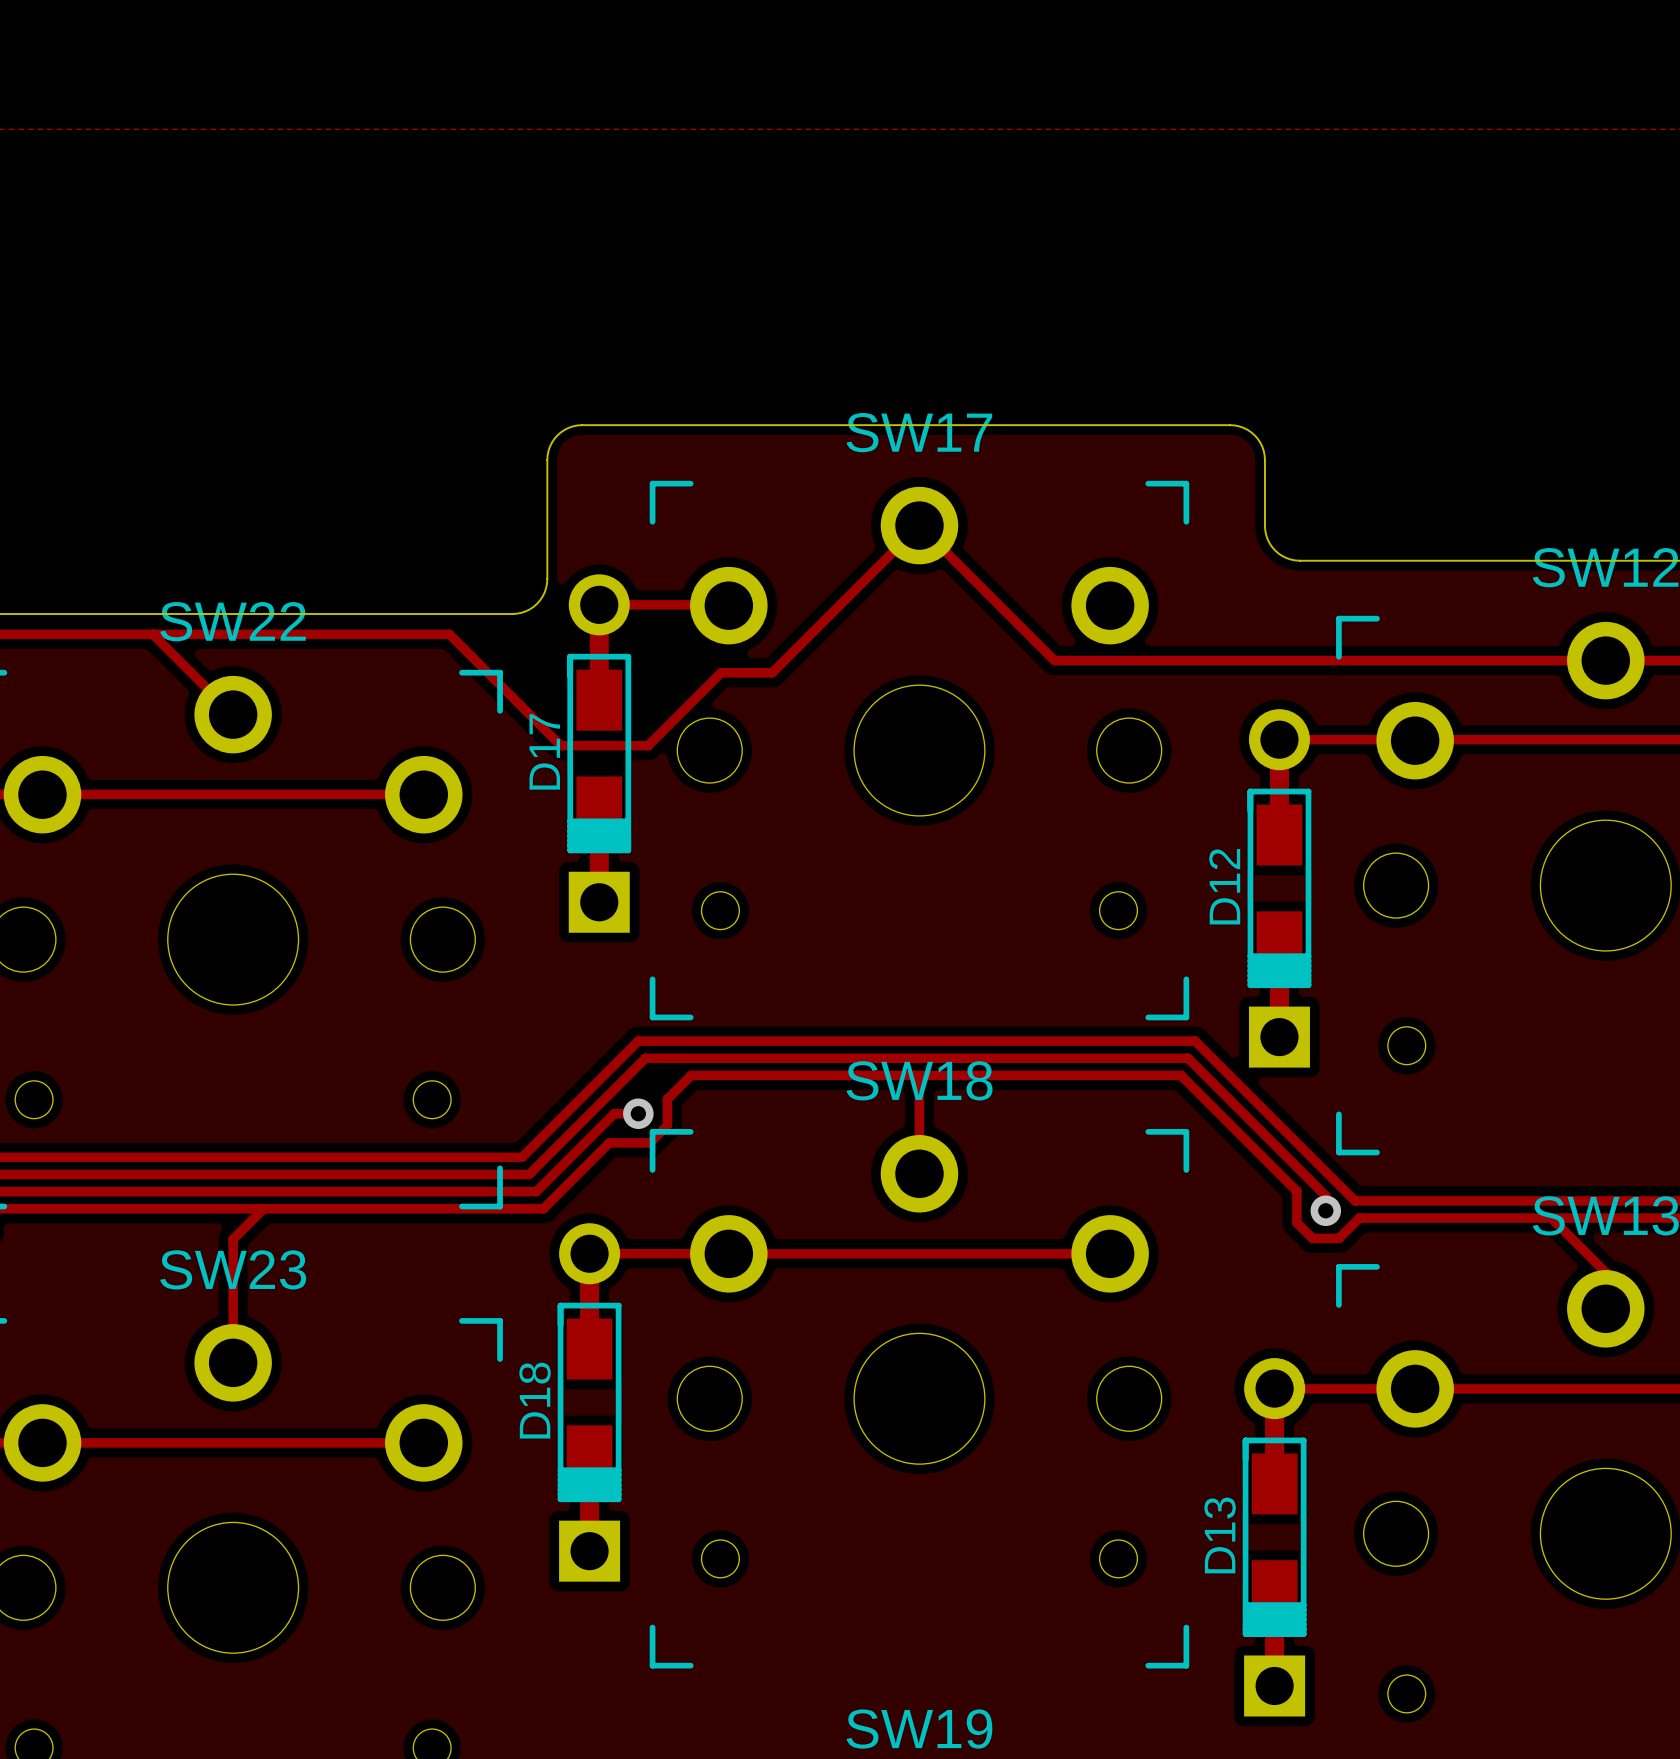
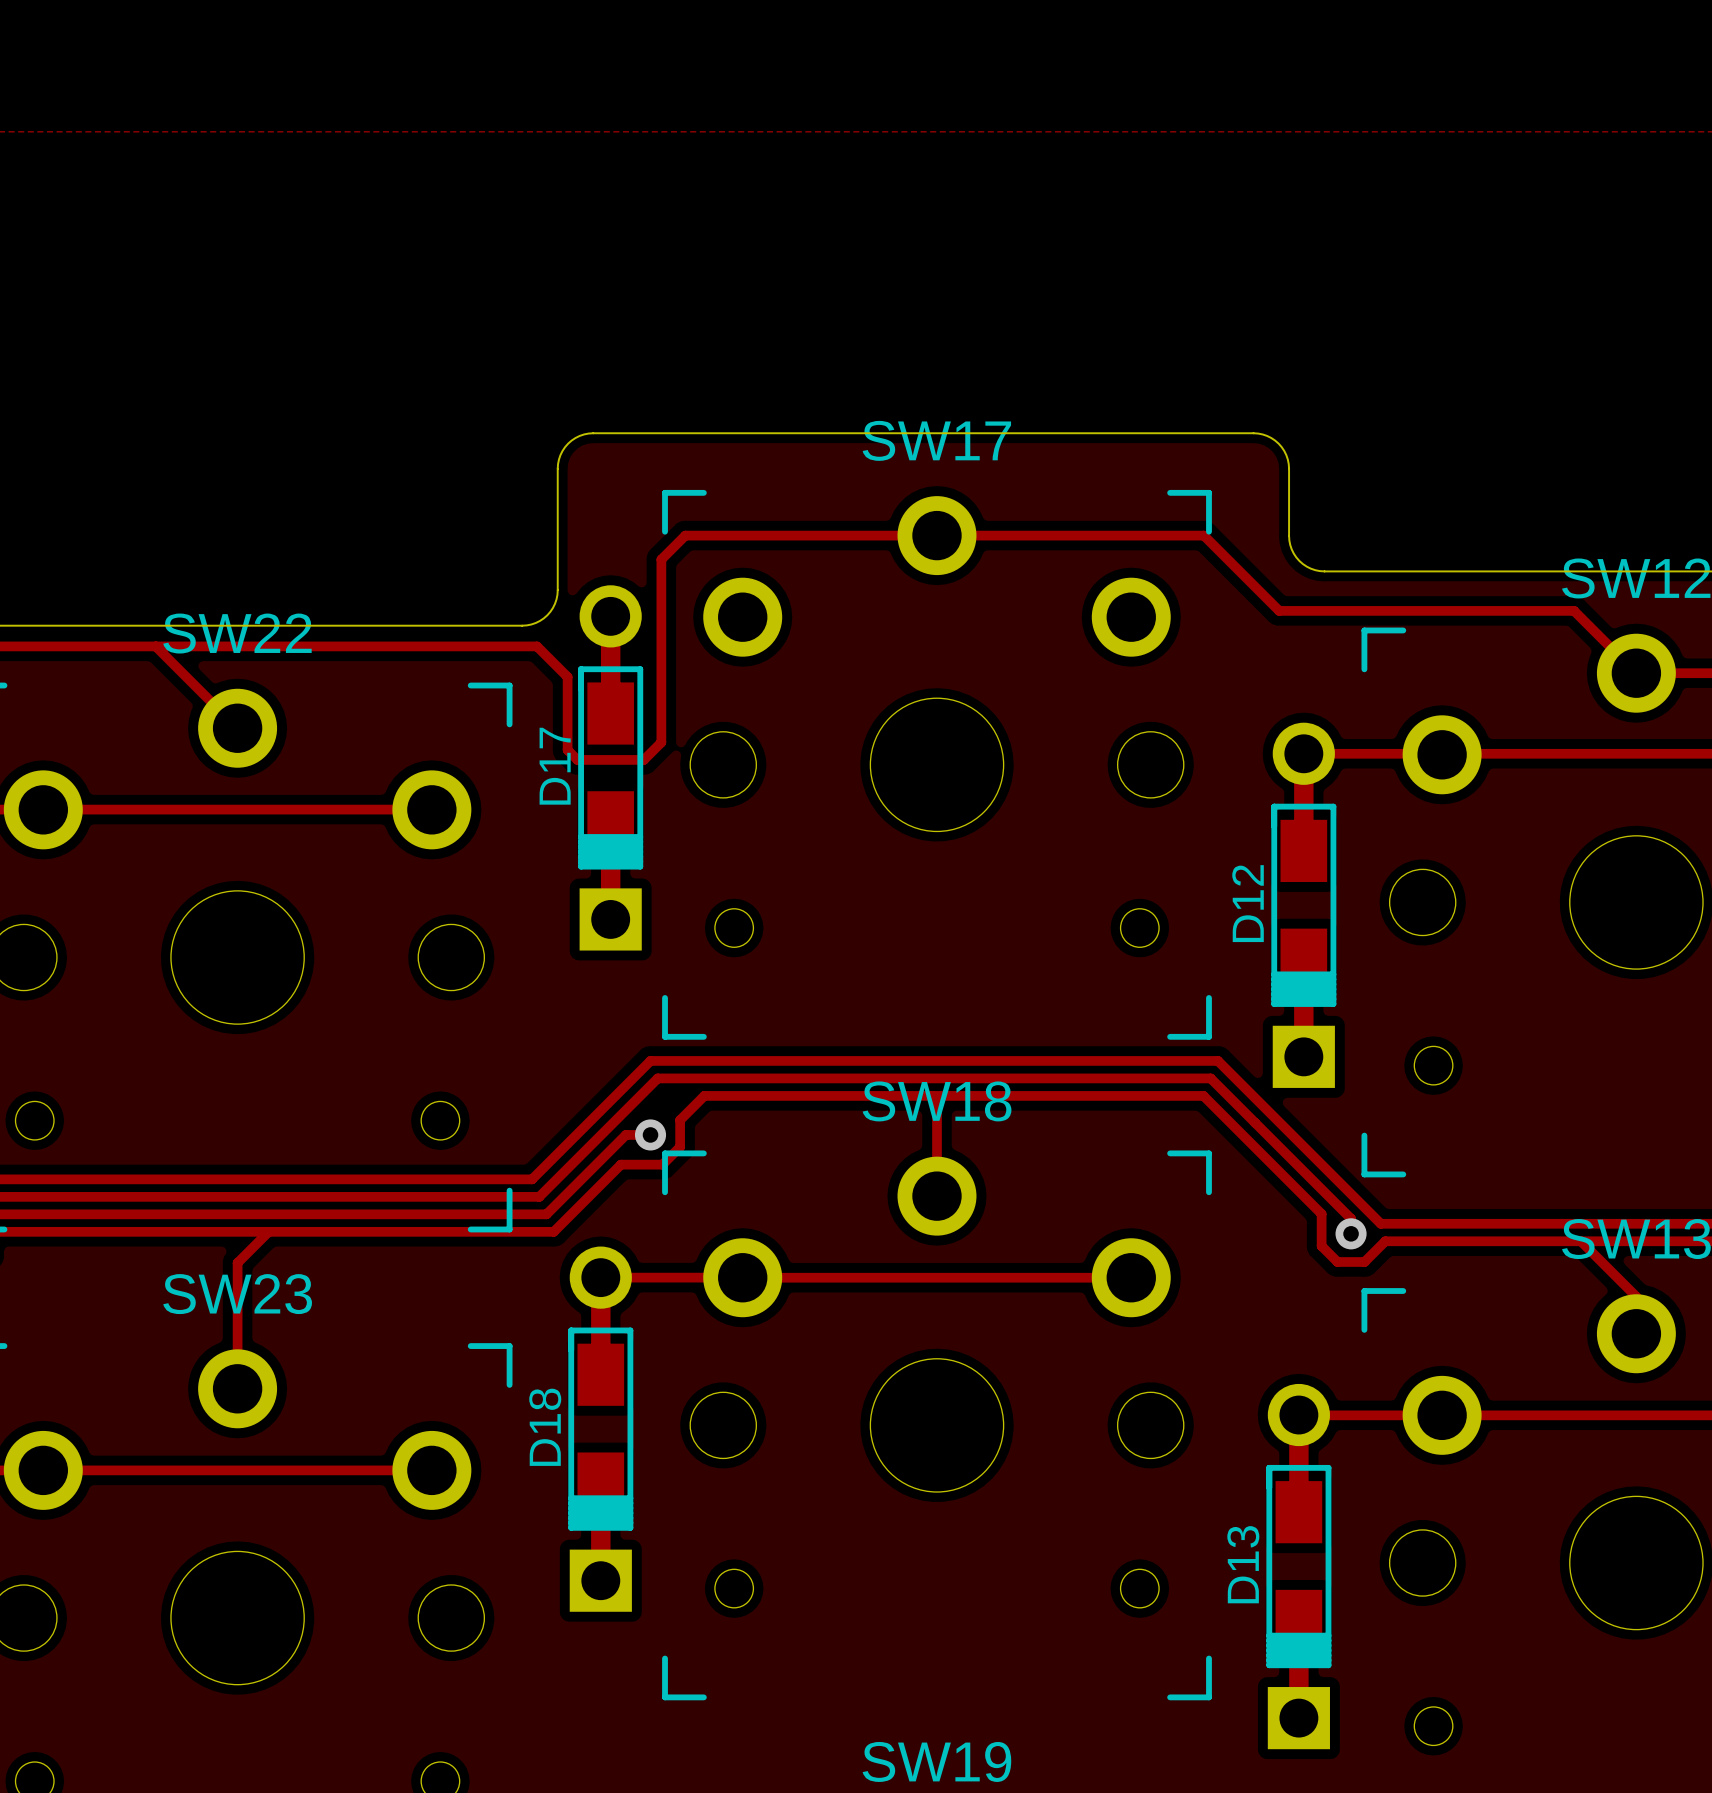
track: (599, 604) (728, 604) -> none
track: (449, 634) (560, 745) (566, 745) -> (458, 646) (537, 646) (567, 677) (567, 750) (577, 759)
track: (1605, 660) (1054, 660) (919, 525) (772, 672) (721, 672) (648, 745) (631, 745) -> (1636, 673) (1574, 610) (1279, 610) (1203, 535) (685, 535) (661, 559) (661, 742) (643, 759)

